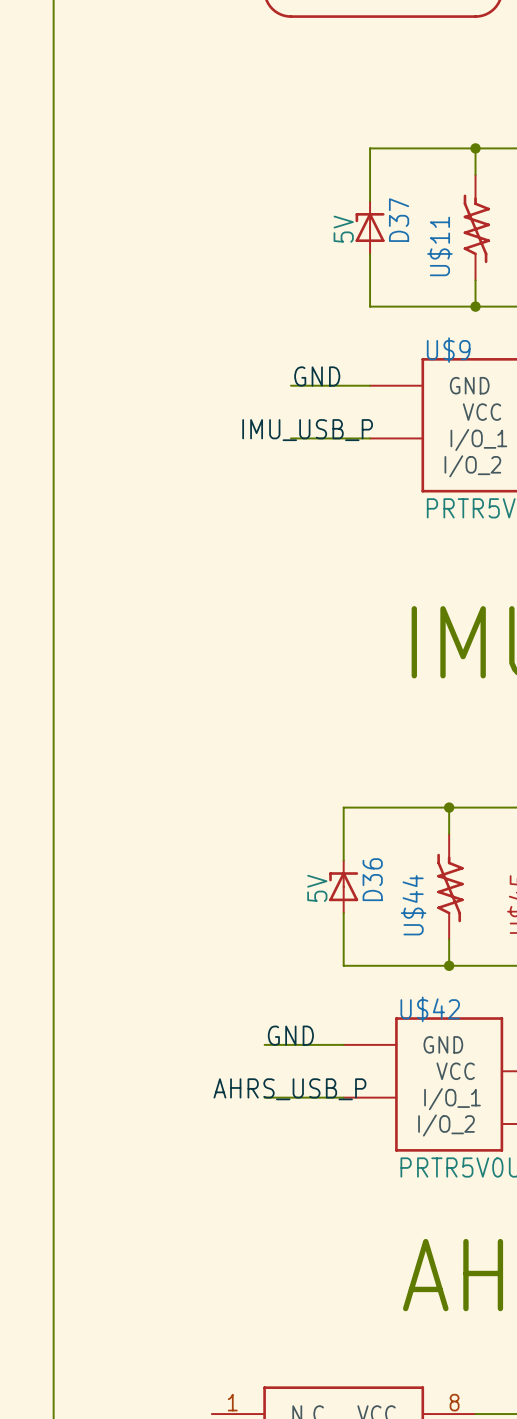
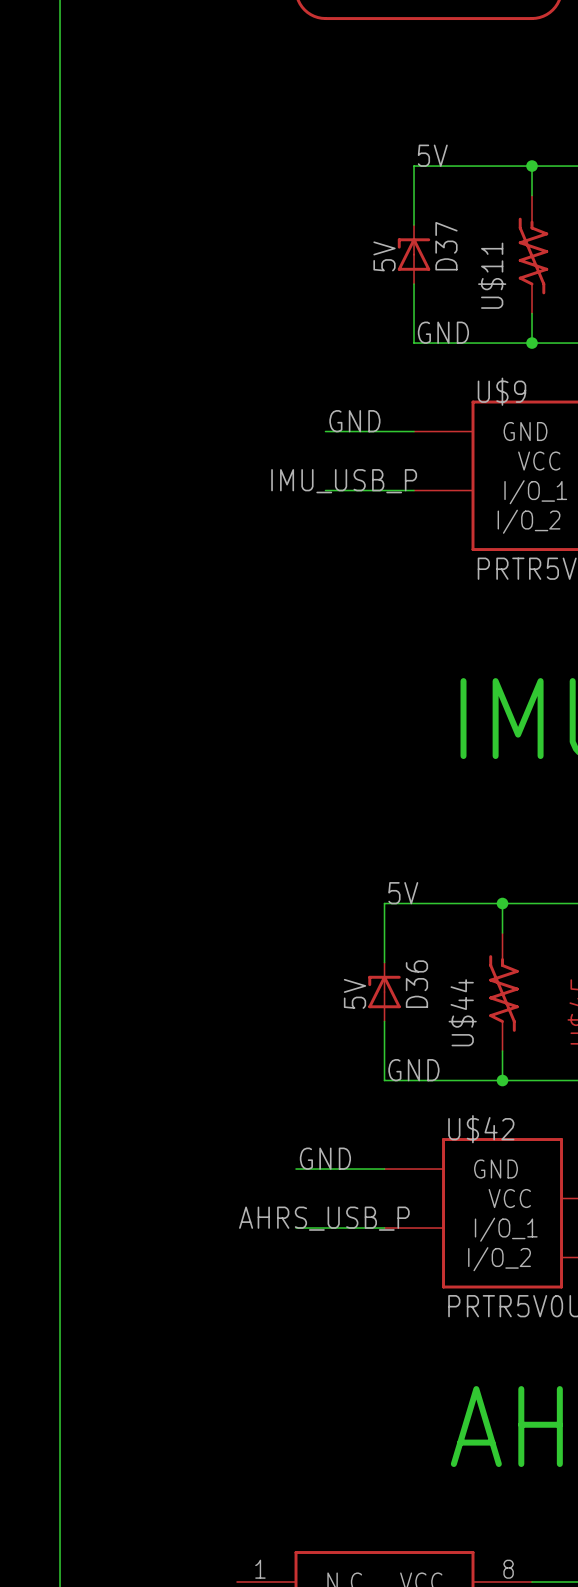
label: none -> 5V (432, 155)
label: none -> GND (443, 332)
label: none -> 5V (403, 893)
label: none -> GND (413, 1070)

